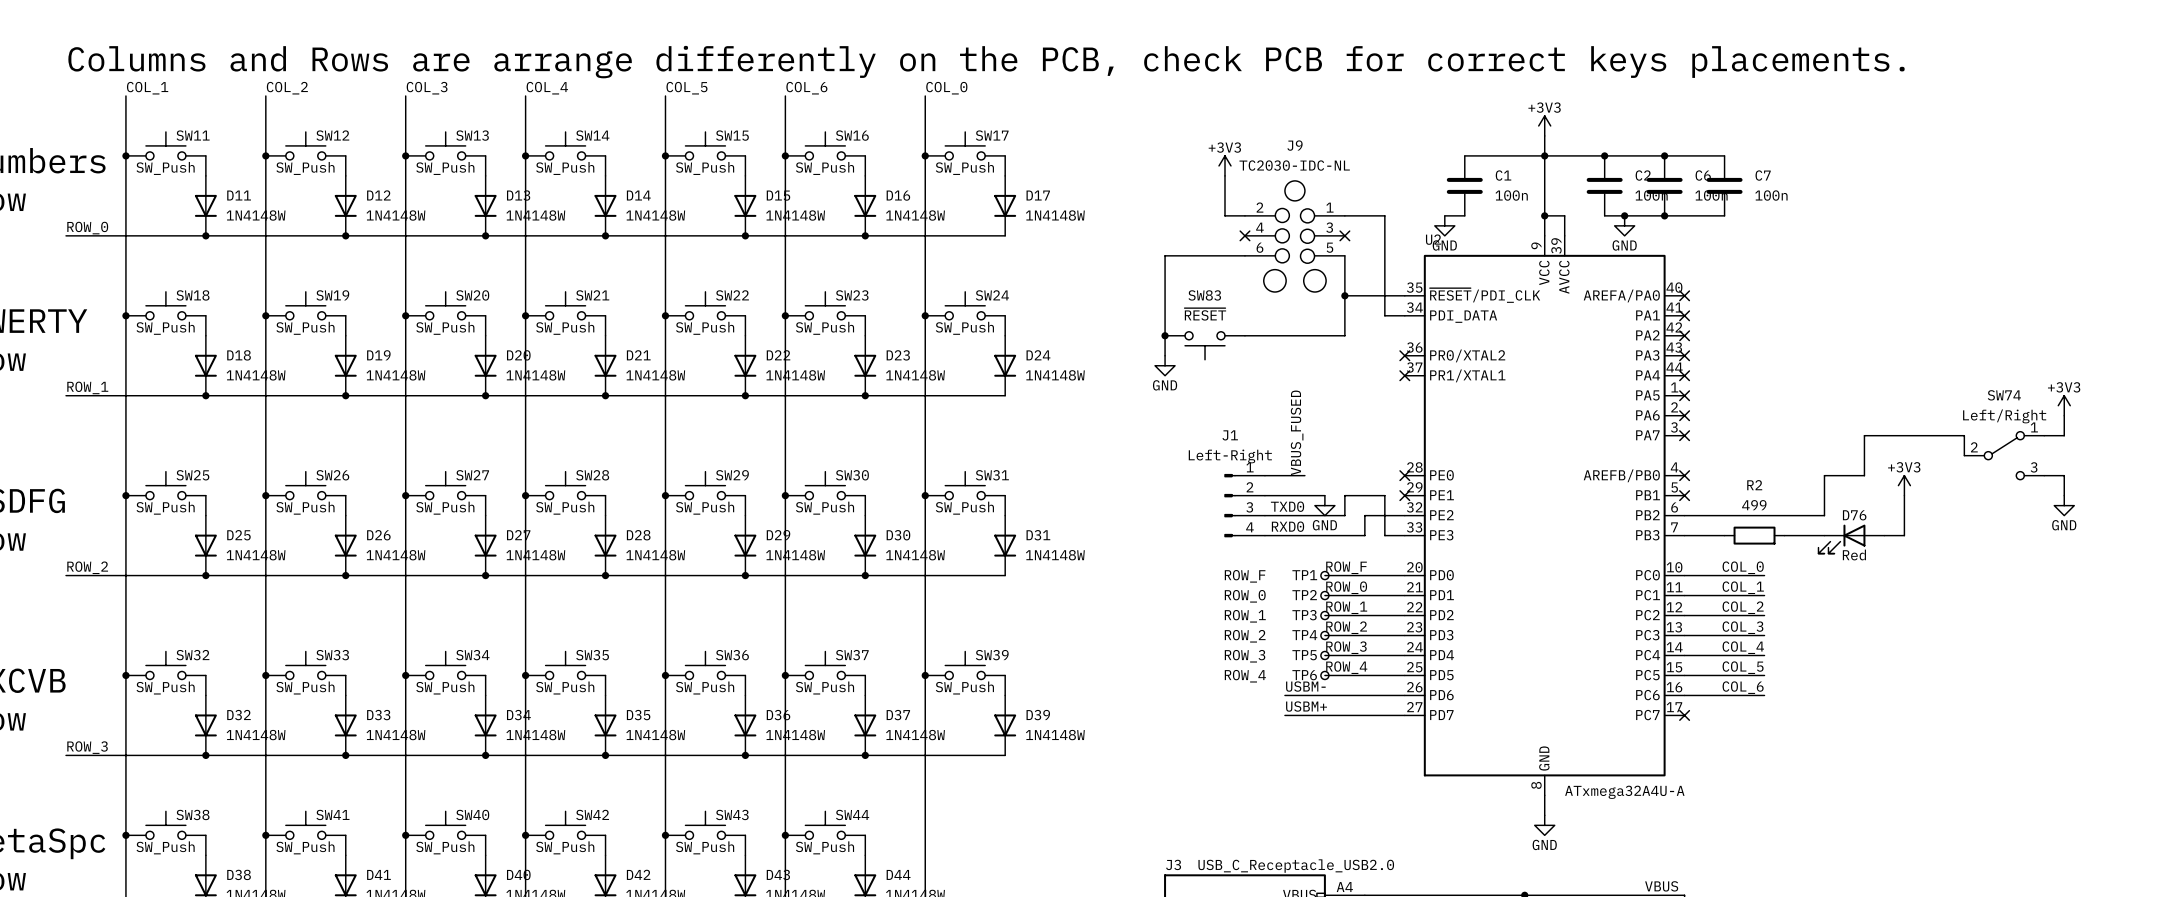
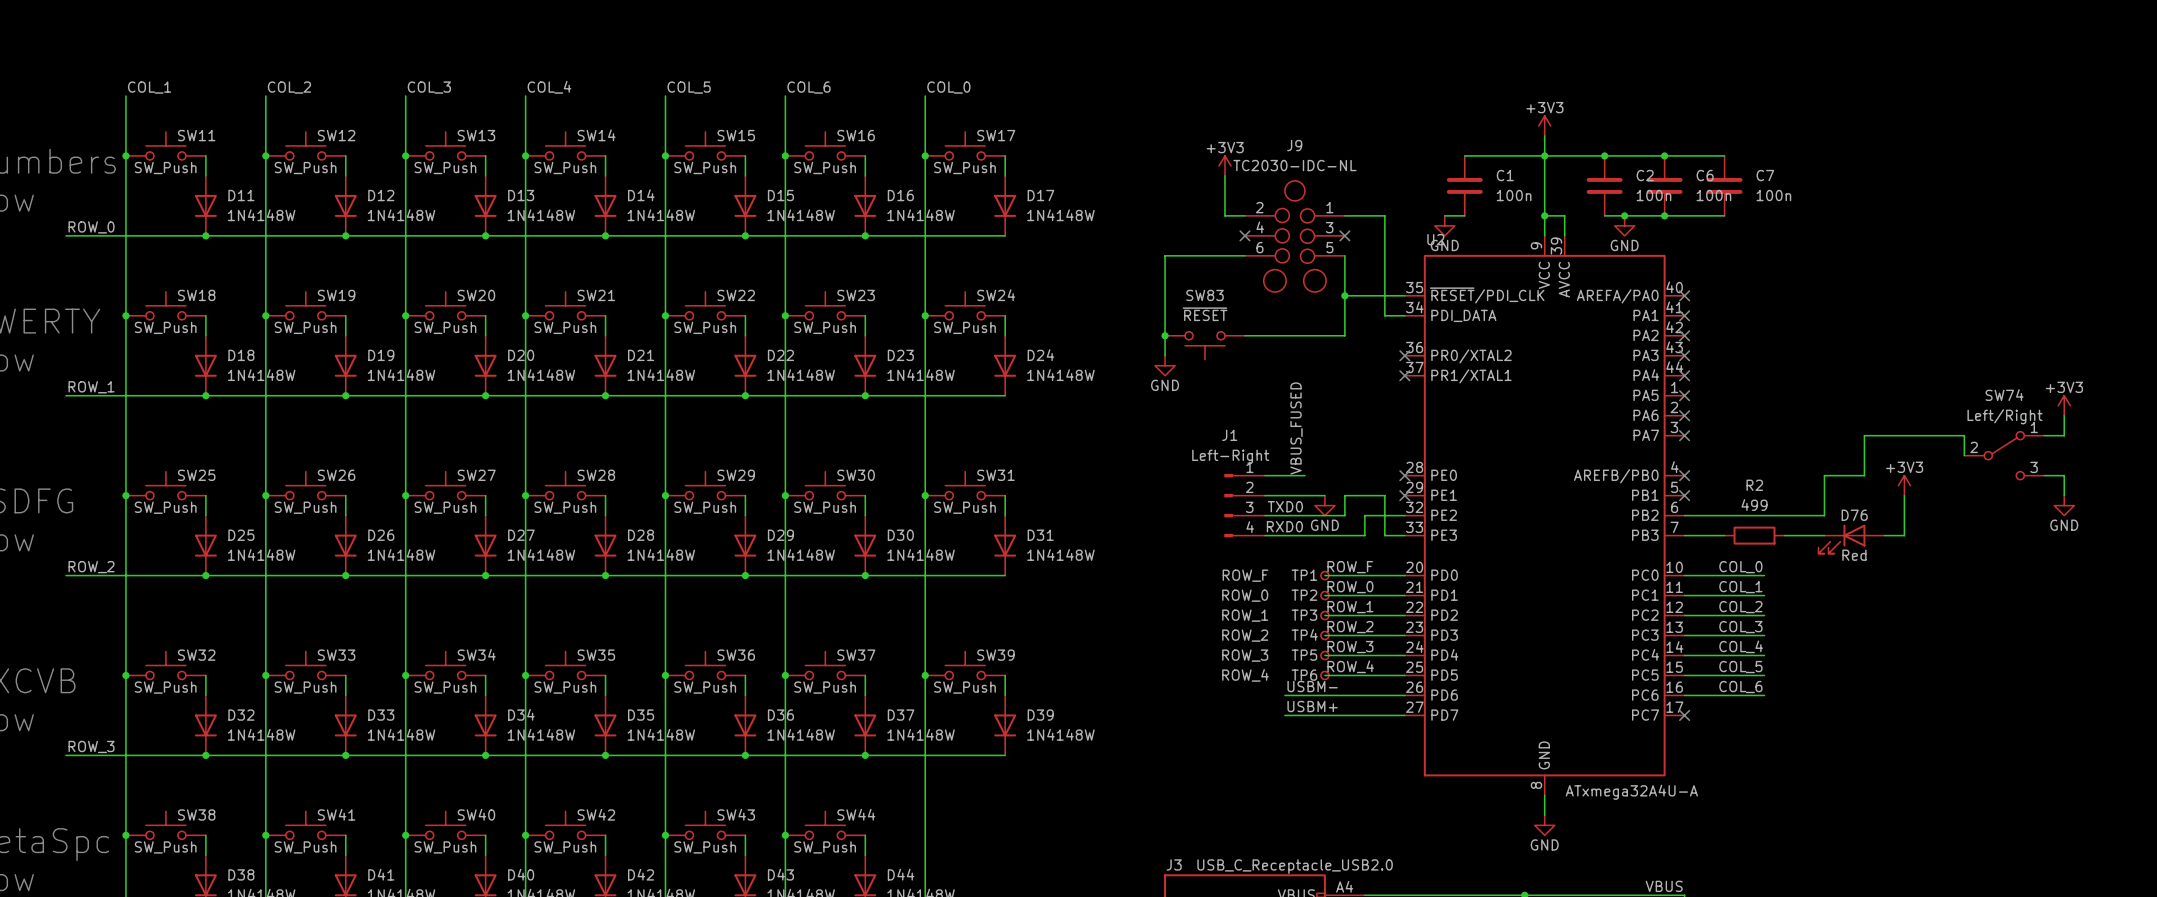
text: Columns and Rows are arrange differently on the PCB, check PCB for correct keys placements. (986, 62) -> none

